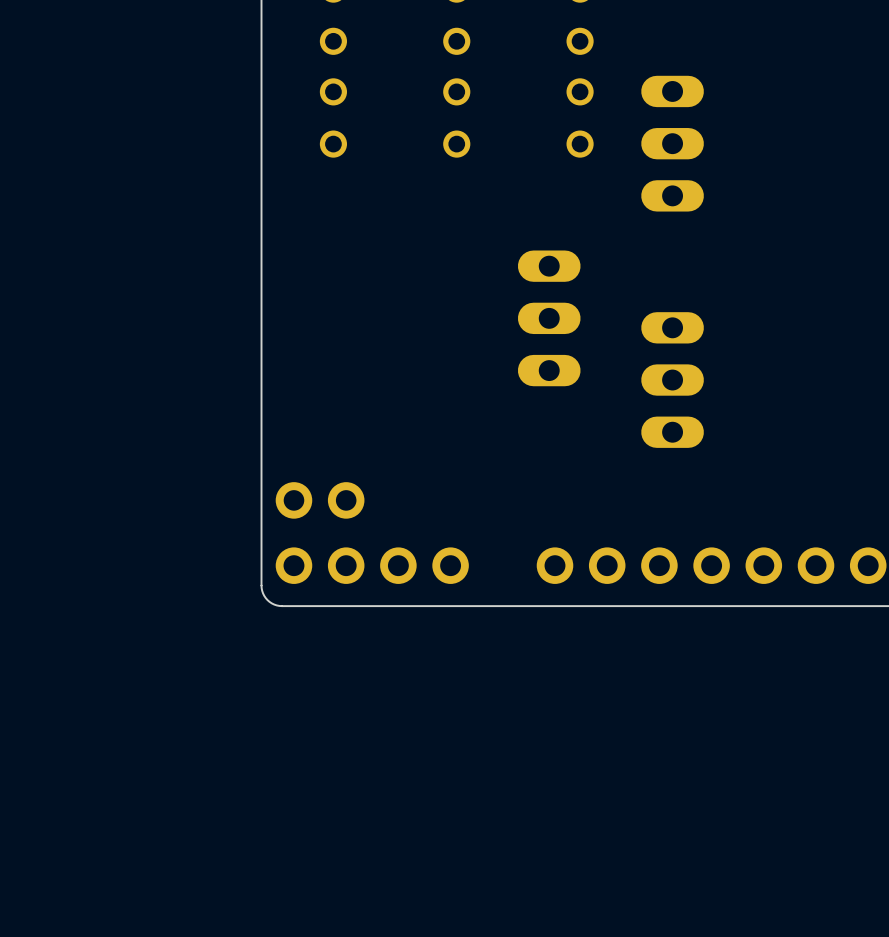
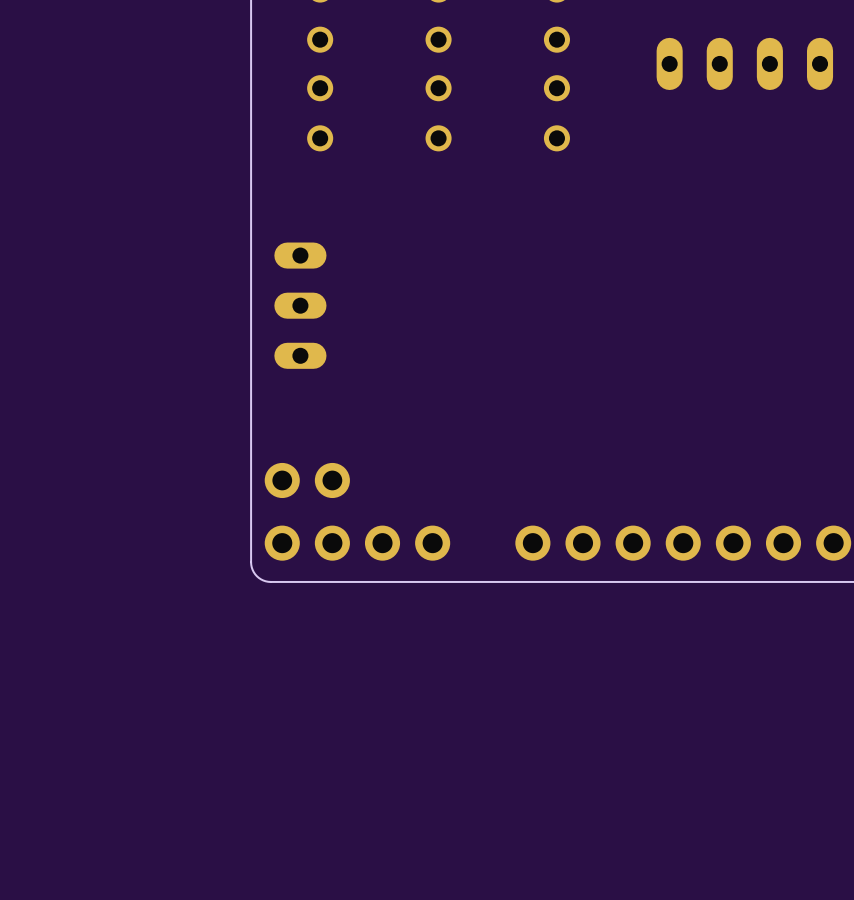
part: none -> (744, 63)
part: (672, 143) -> none
part: none -> (300, 305)
part: (549, 318) -> none
part: (672, 380) -> none

